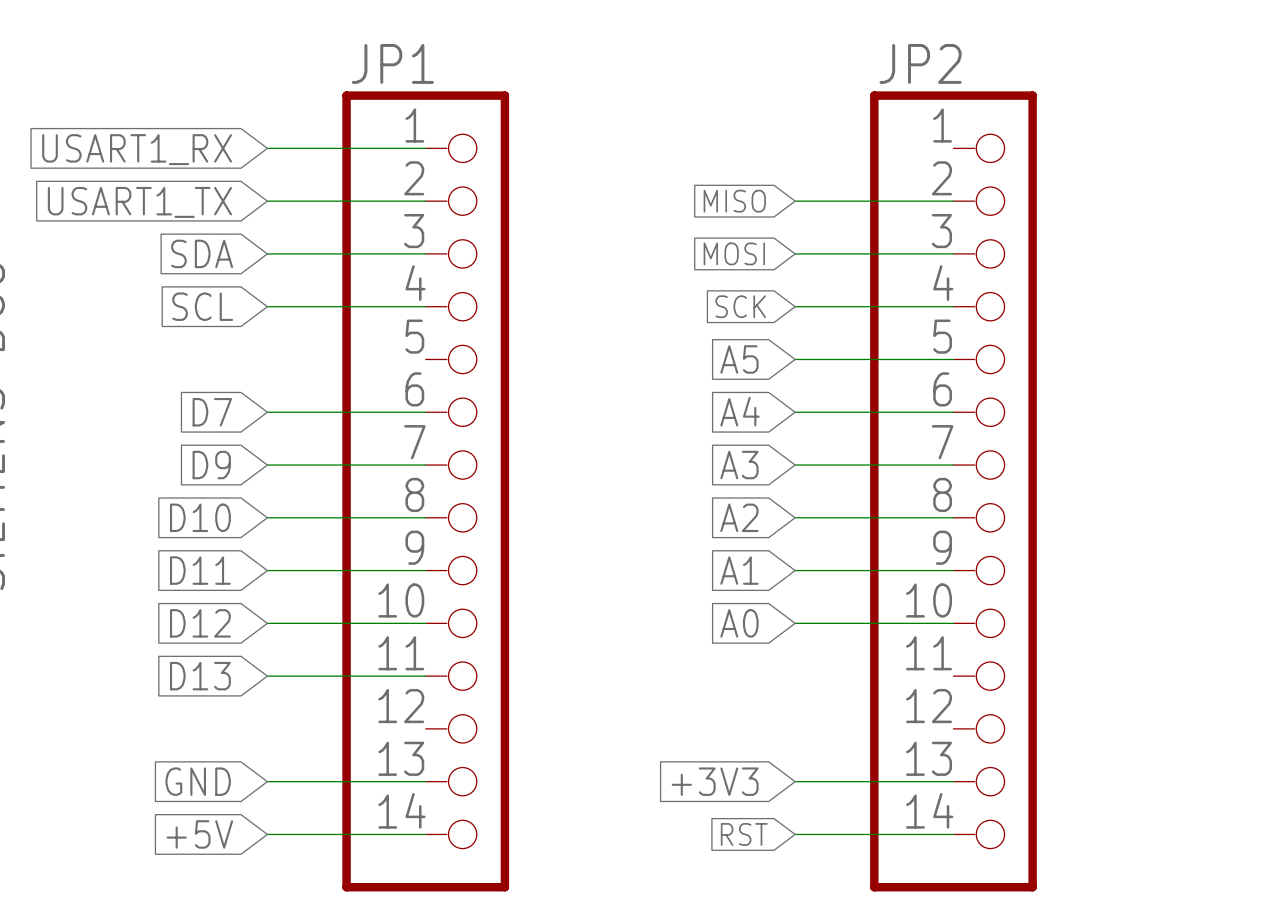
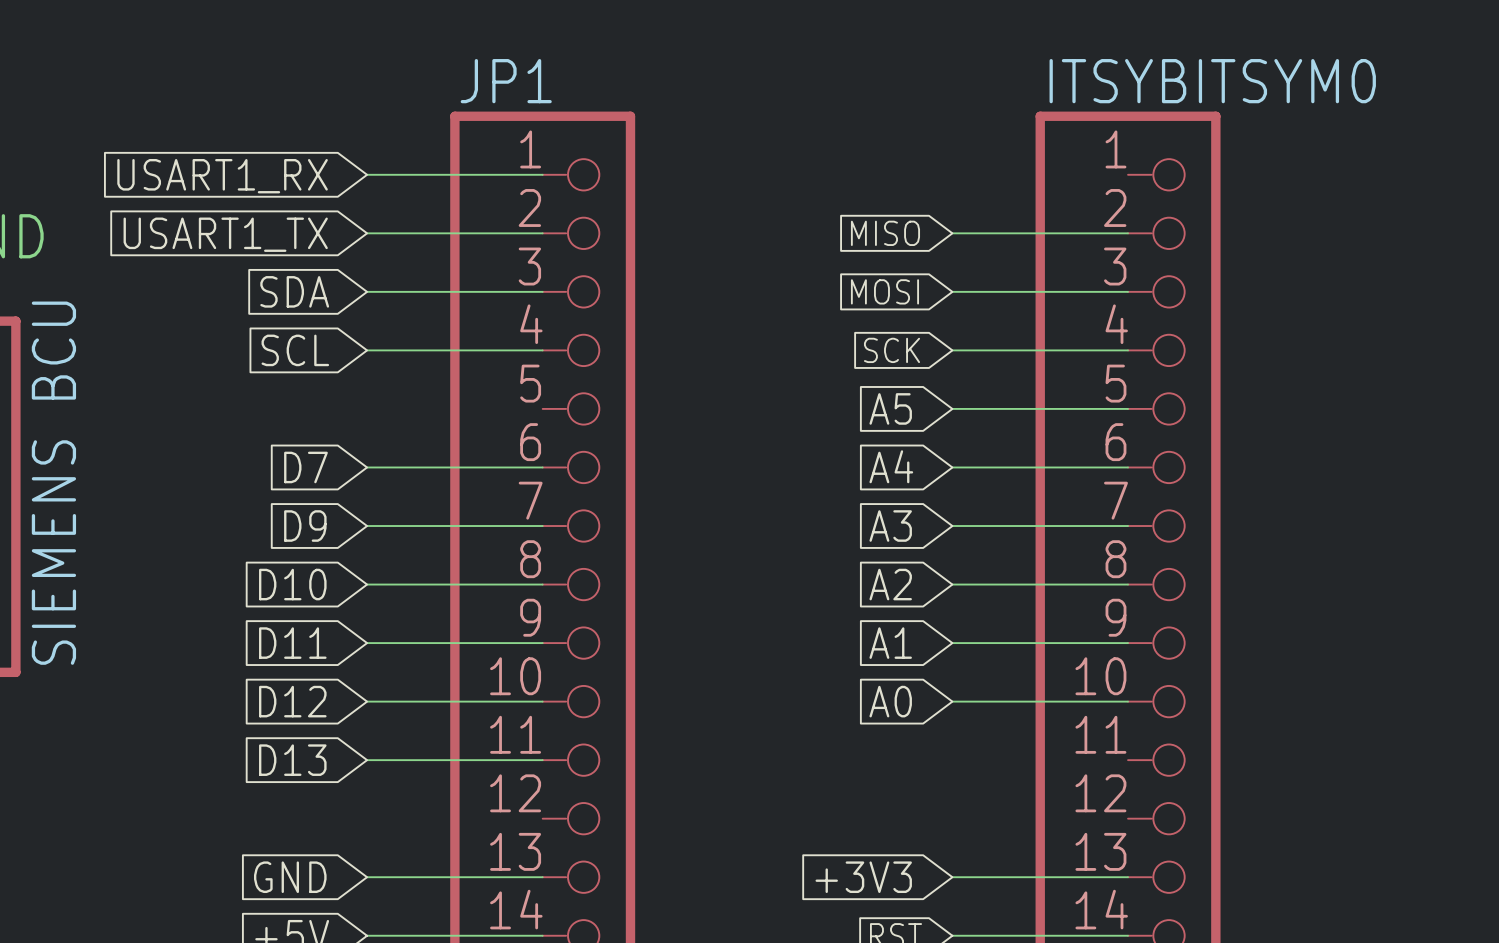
JP2 name: JP2 (920, 63) -> ITSYBITSYM0 (1212, 81)

